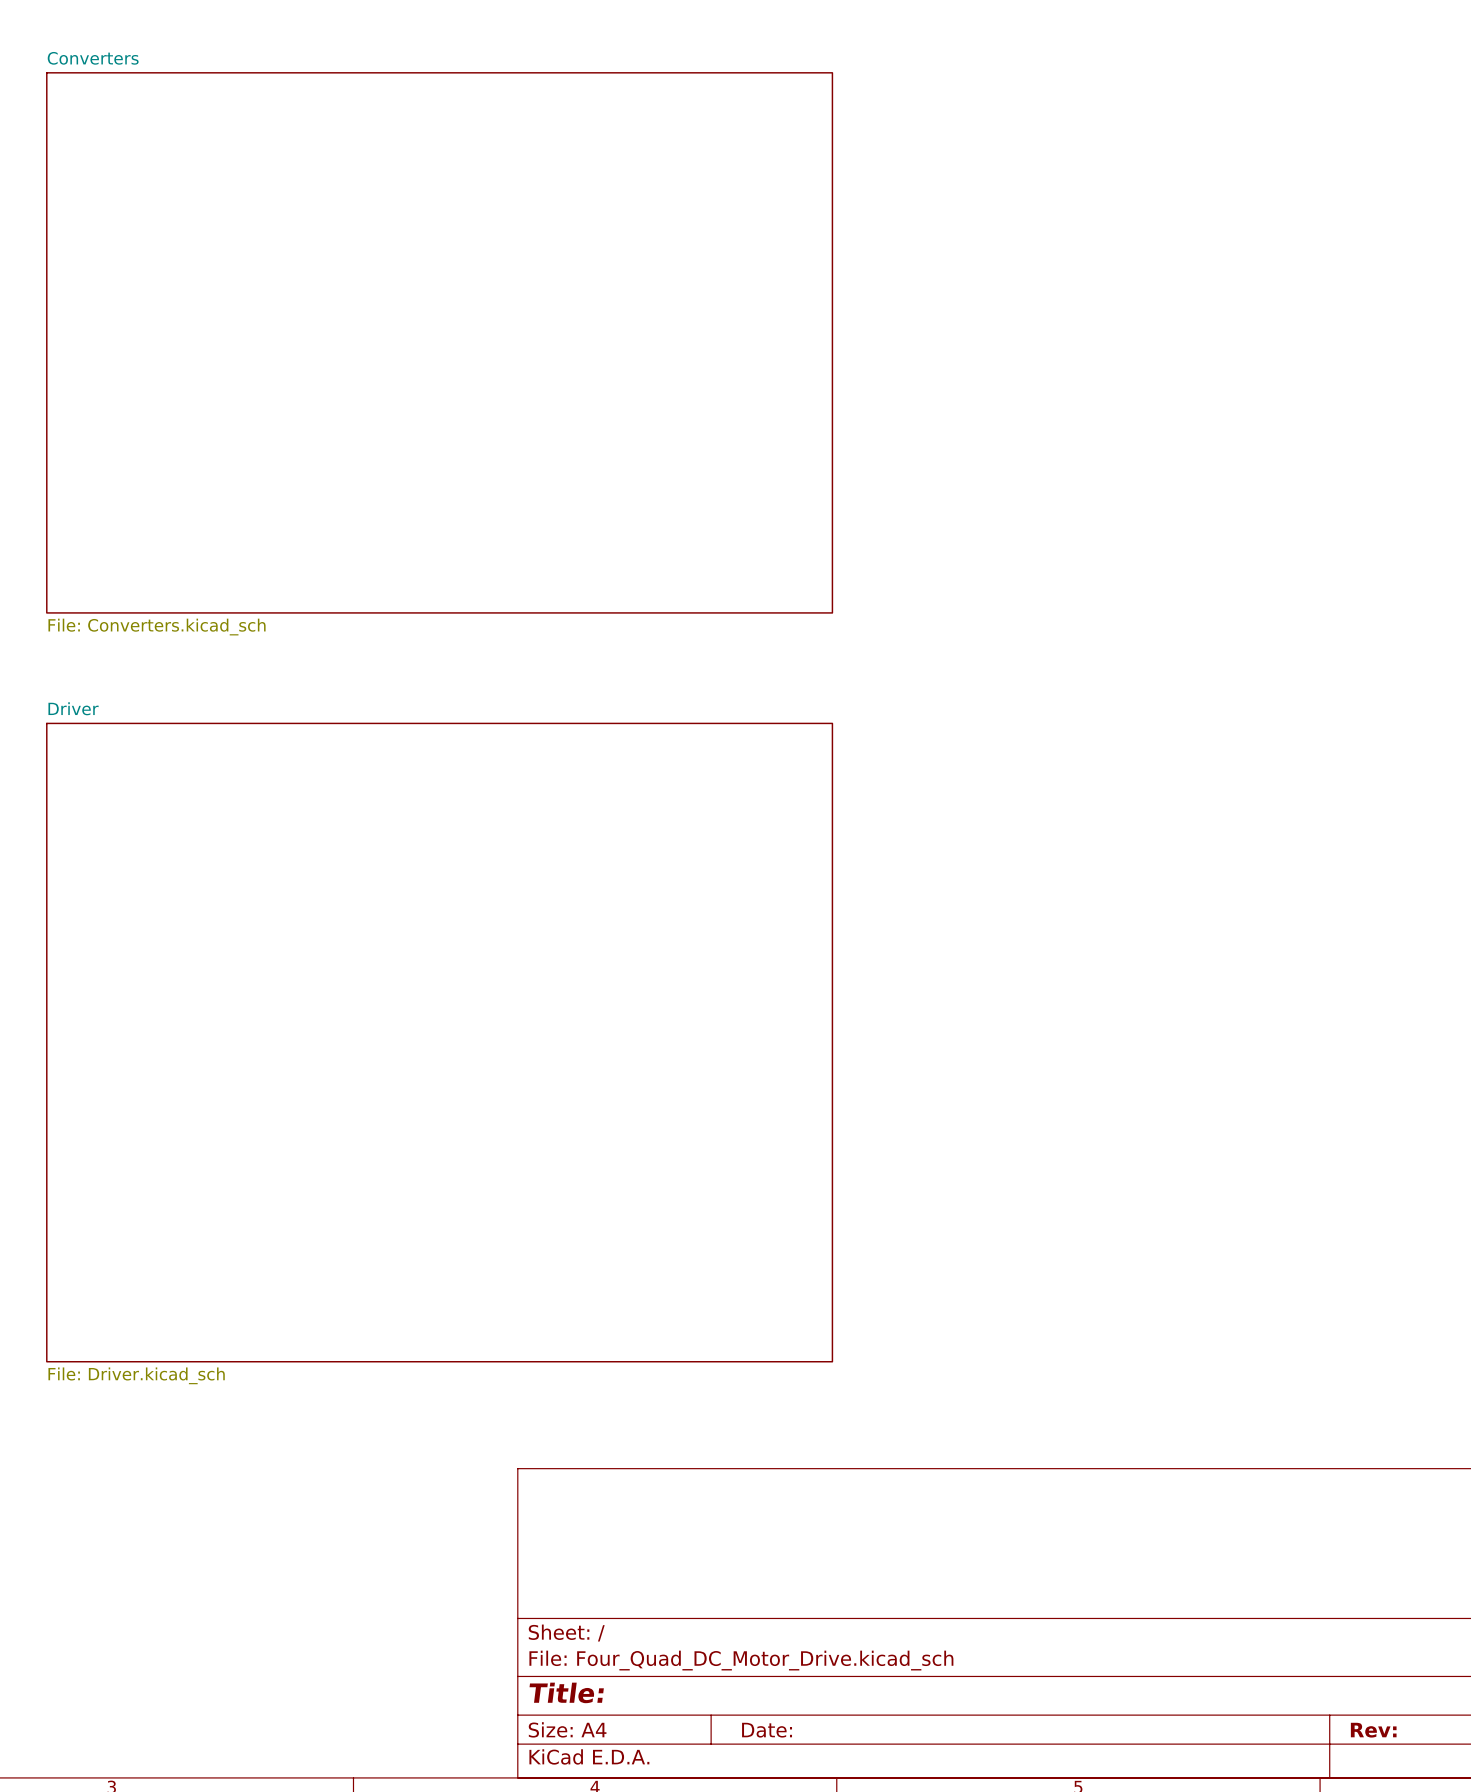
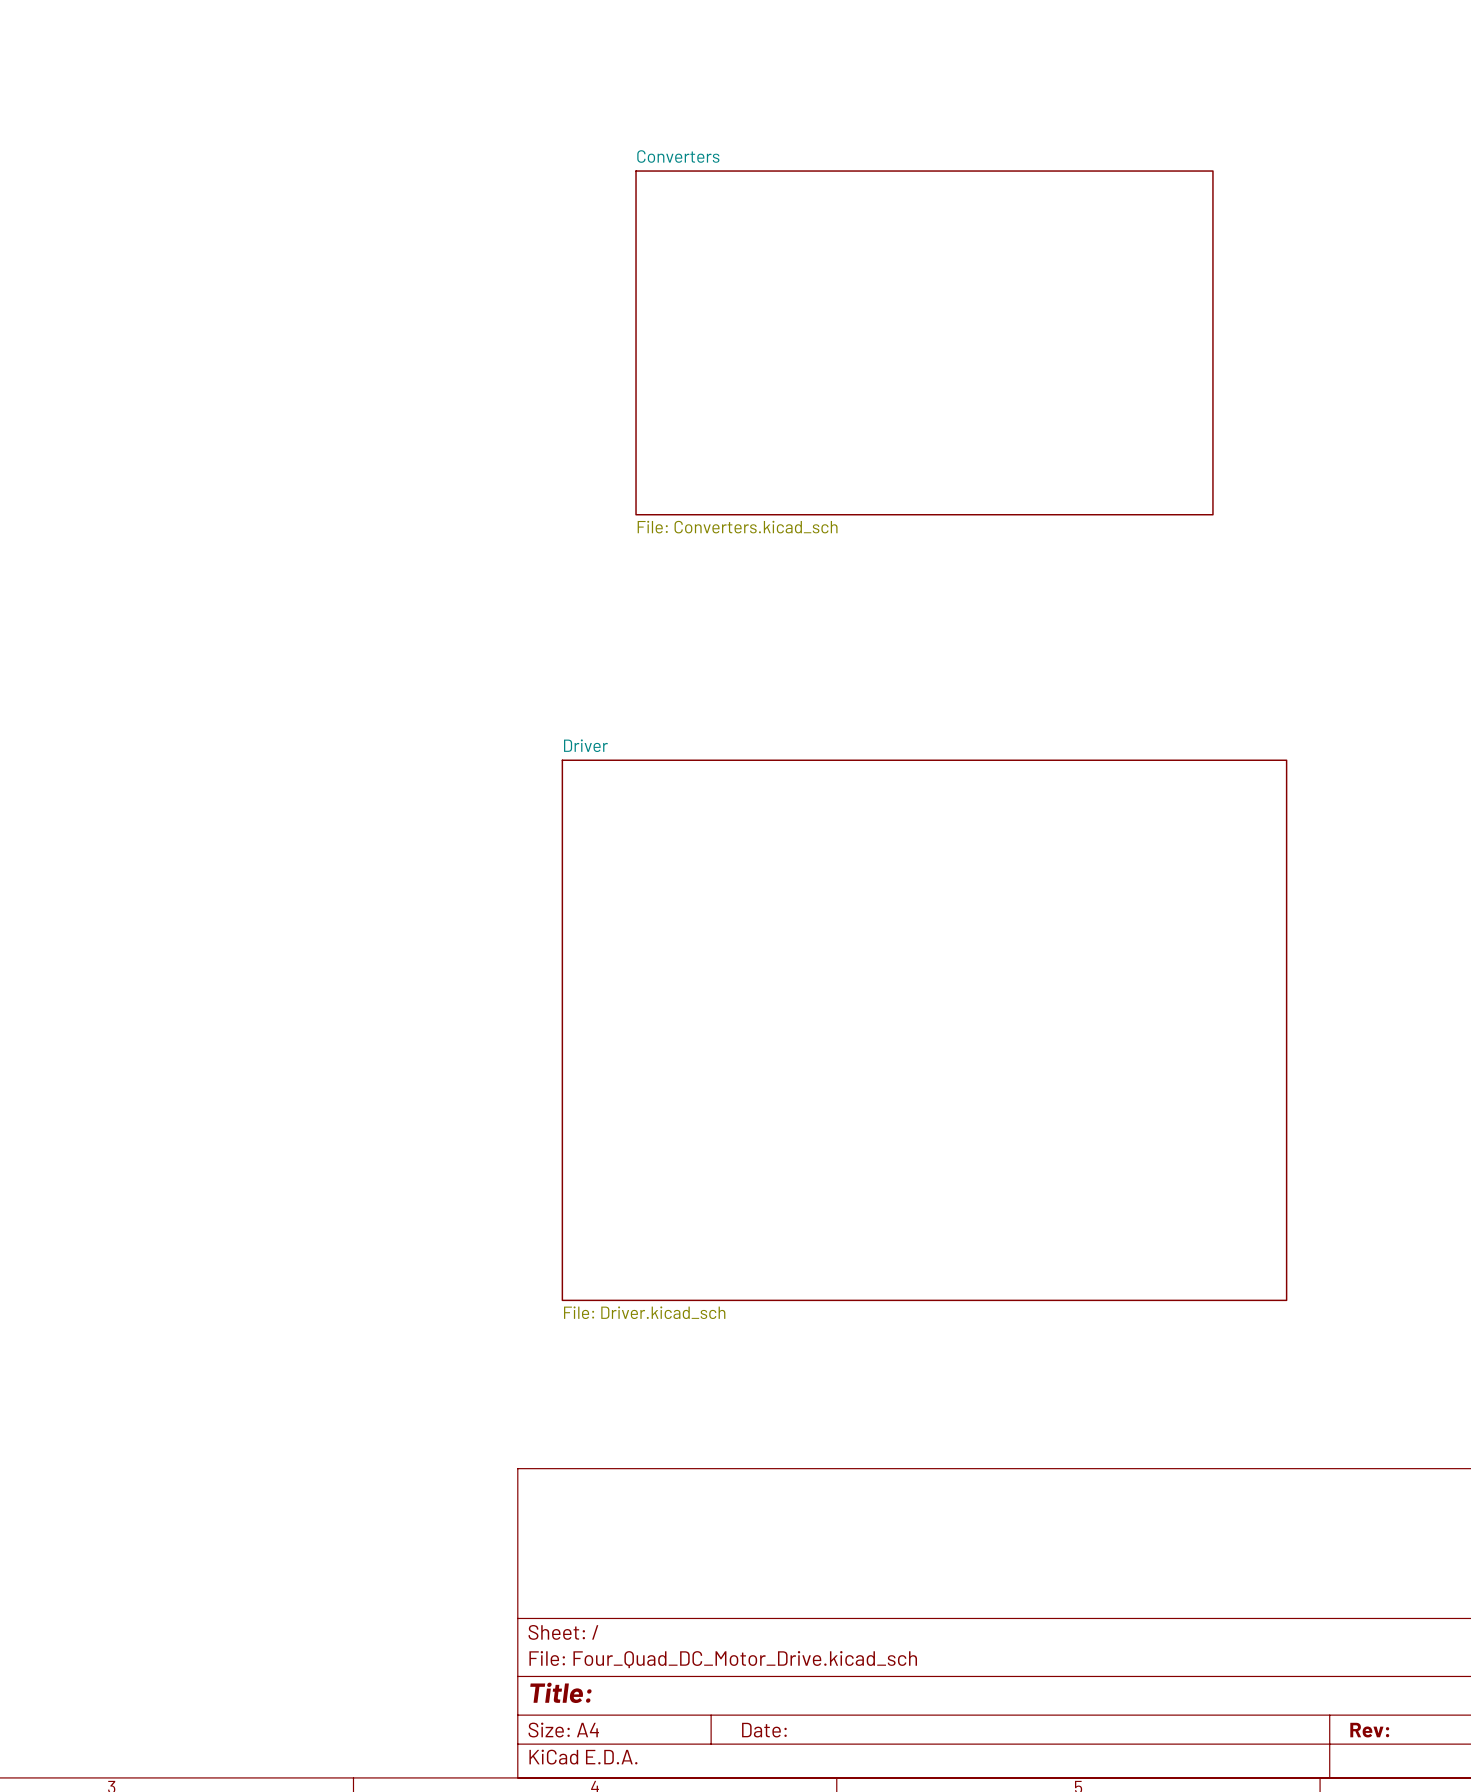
sheet Converters: File: Converters.kicad_sch (439, 342) -> none
sheet Converters: none -> File: Converters.kicad_sch (924, 342)
sheet Driver: none -> File: Driver.kicad_sch (924, 1030)
sheet Driver: File: Driver.kicad_sch (439, 1042) -> none

